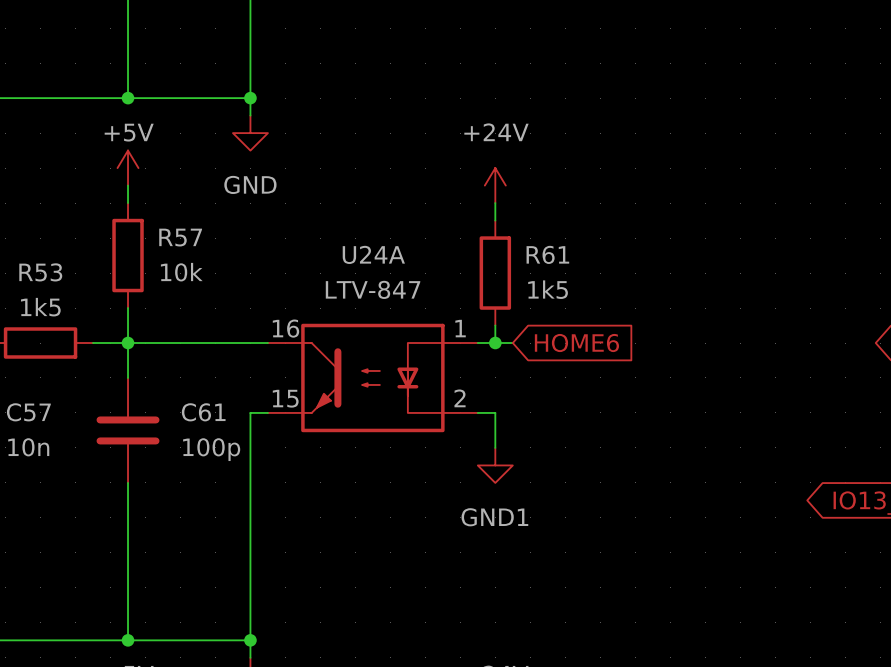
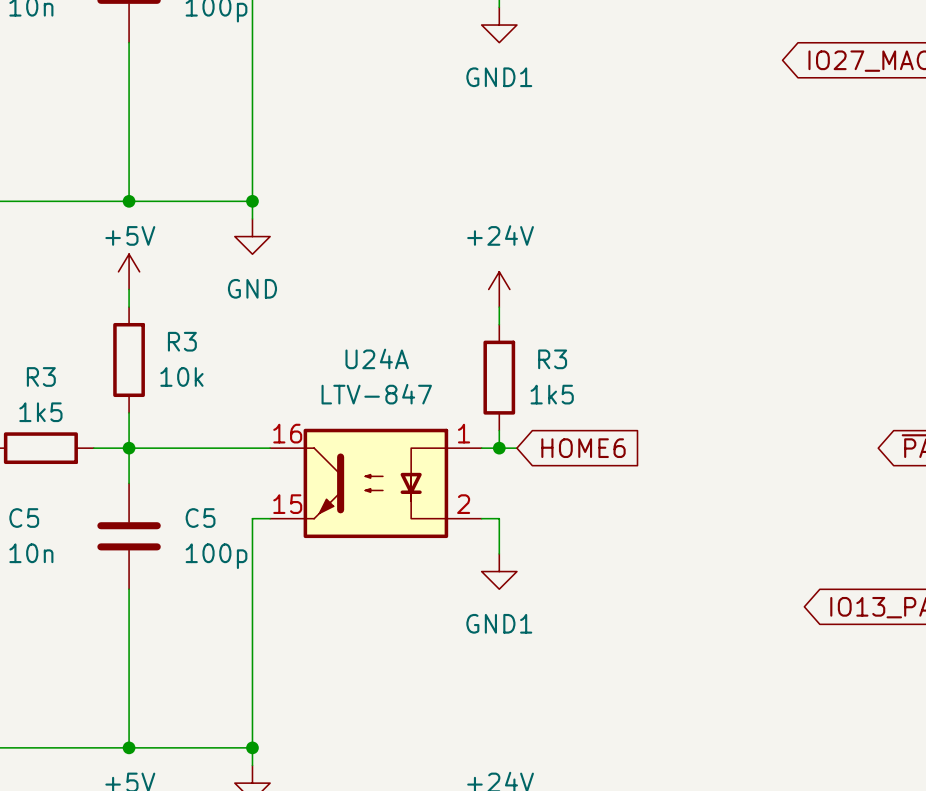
R57 name: R57 (180, 237) -> R3 (182, 341)
R61 name: R61 (547, 254) -> R3 (552, 359)
R53 name: R53 (40, 272) -> R3 (41, 376)
C57 name: C57 (28, 412) -> C5 (24, 518)
C61 name: C61 (203, 412) -> C5 (200, 518)

